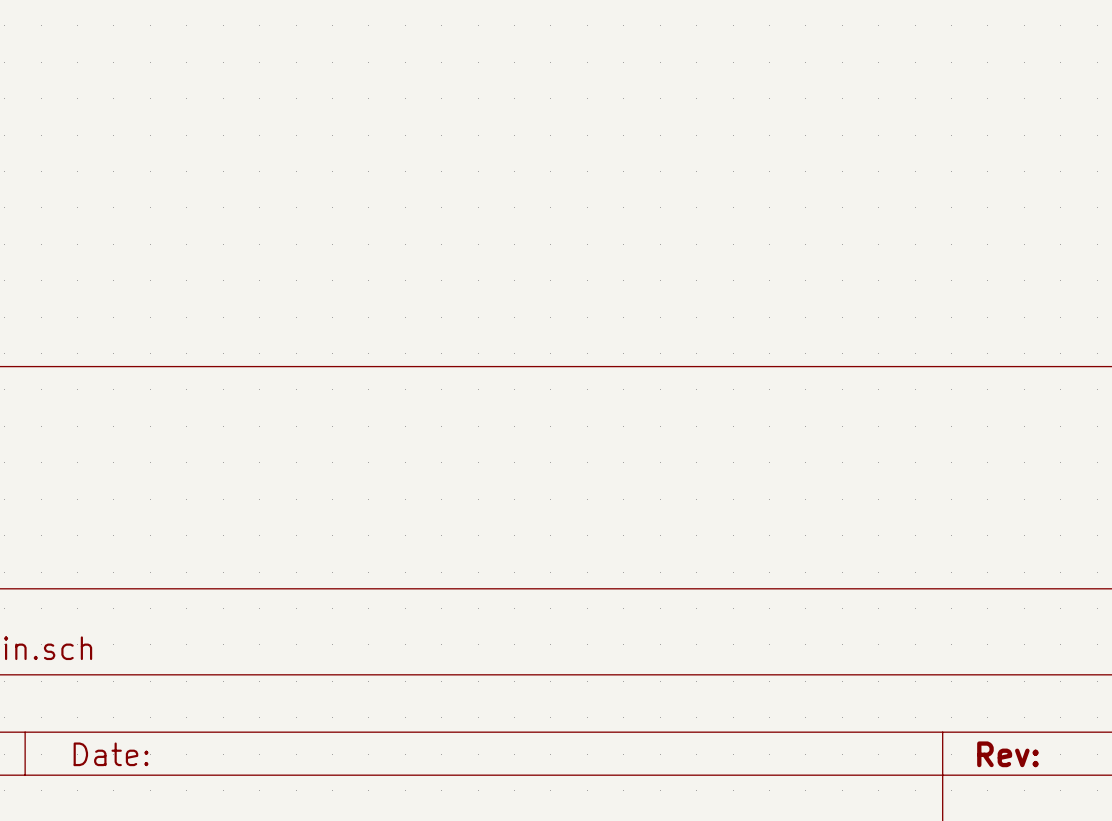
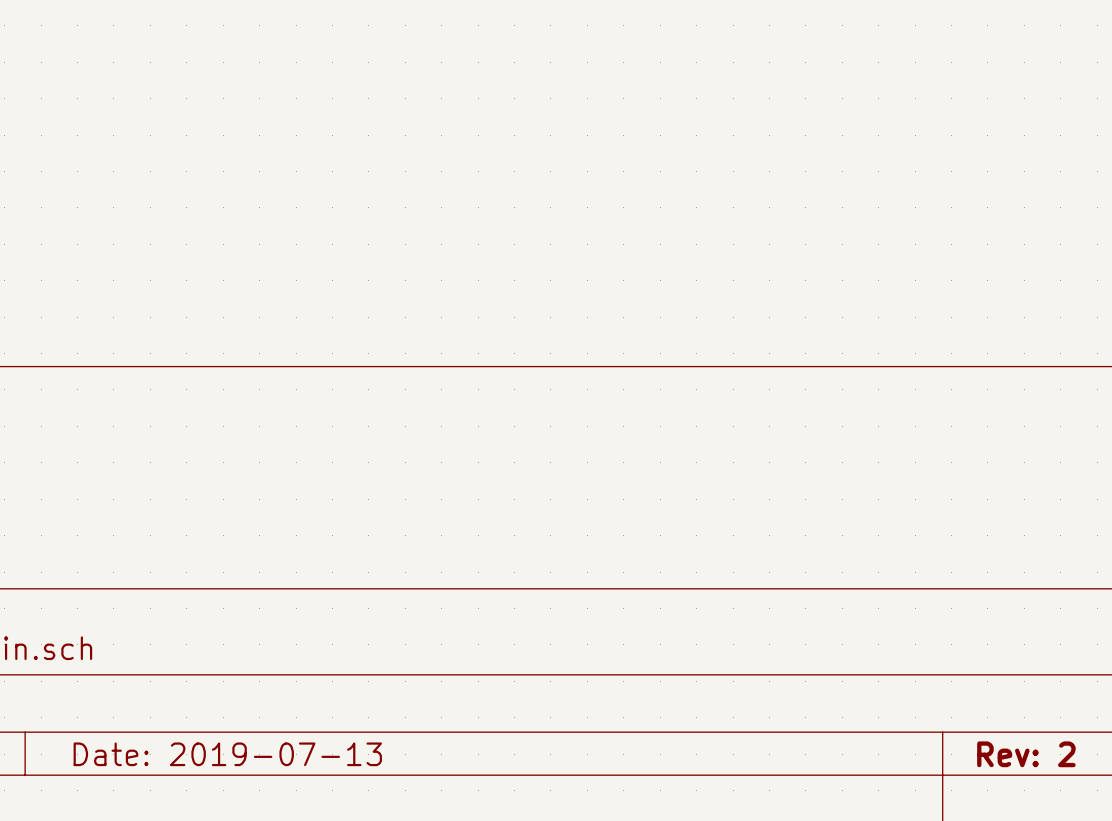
title block: Date: (111, 754) -> Date: 2019-07-13 (227, 754)
title block: Rev: (1007, 754) -> Rev: 2 (1026, 754)

